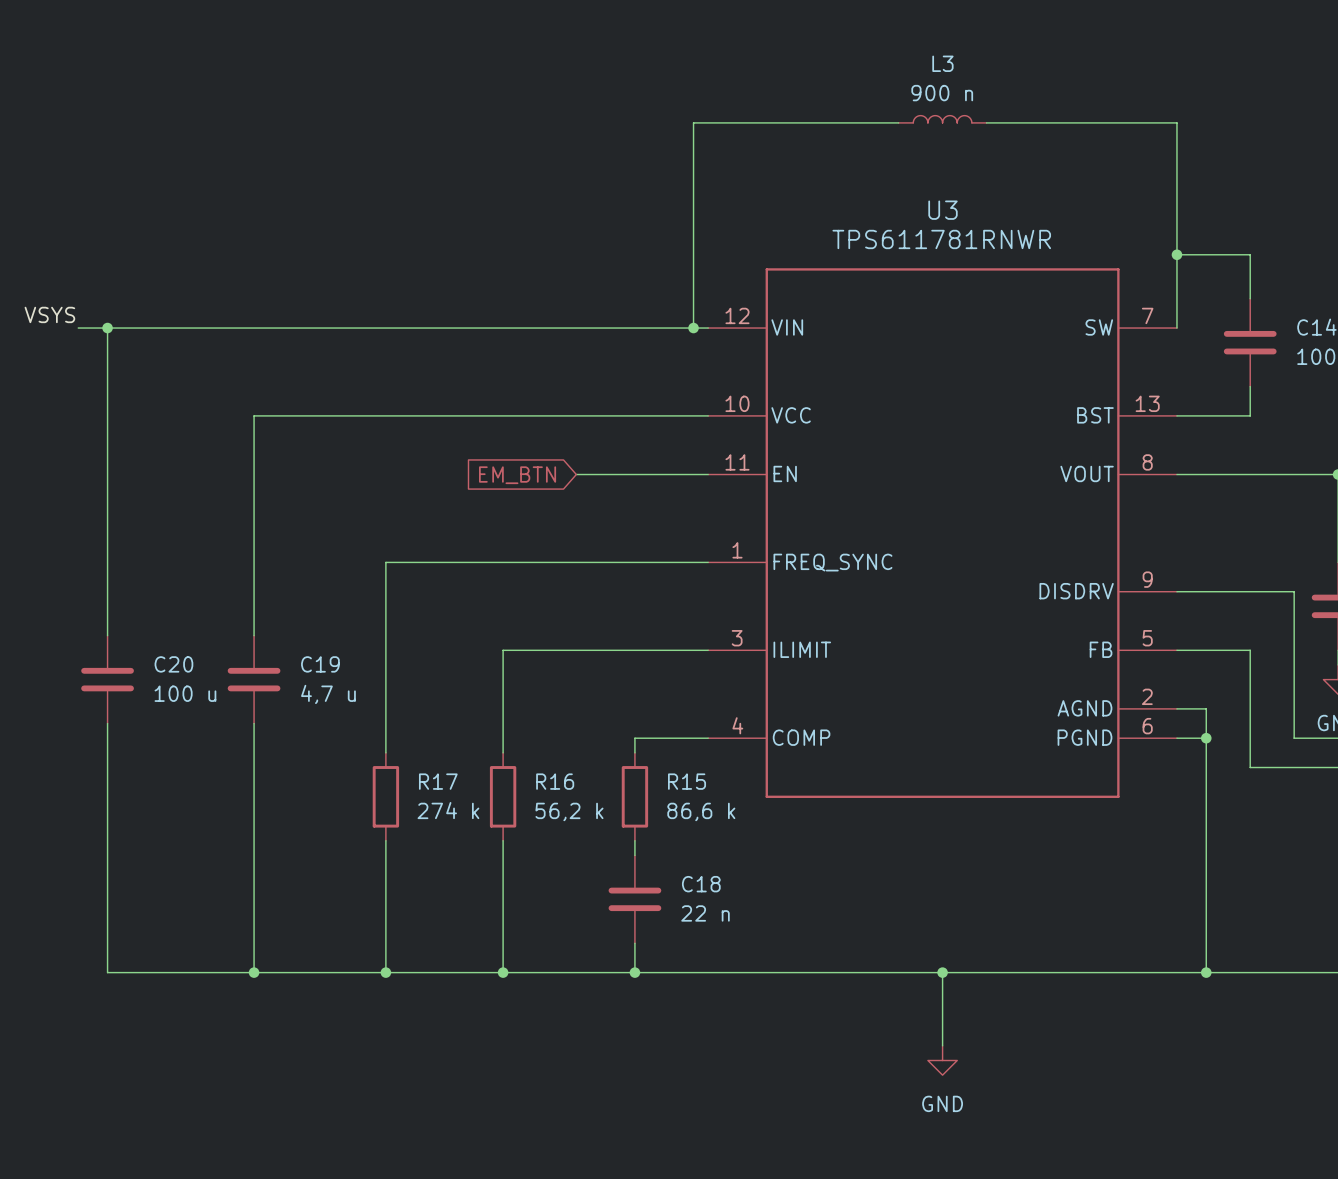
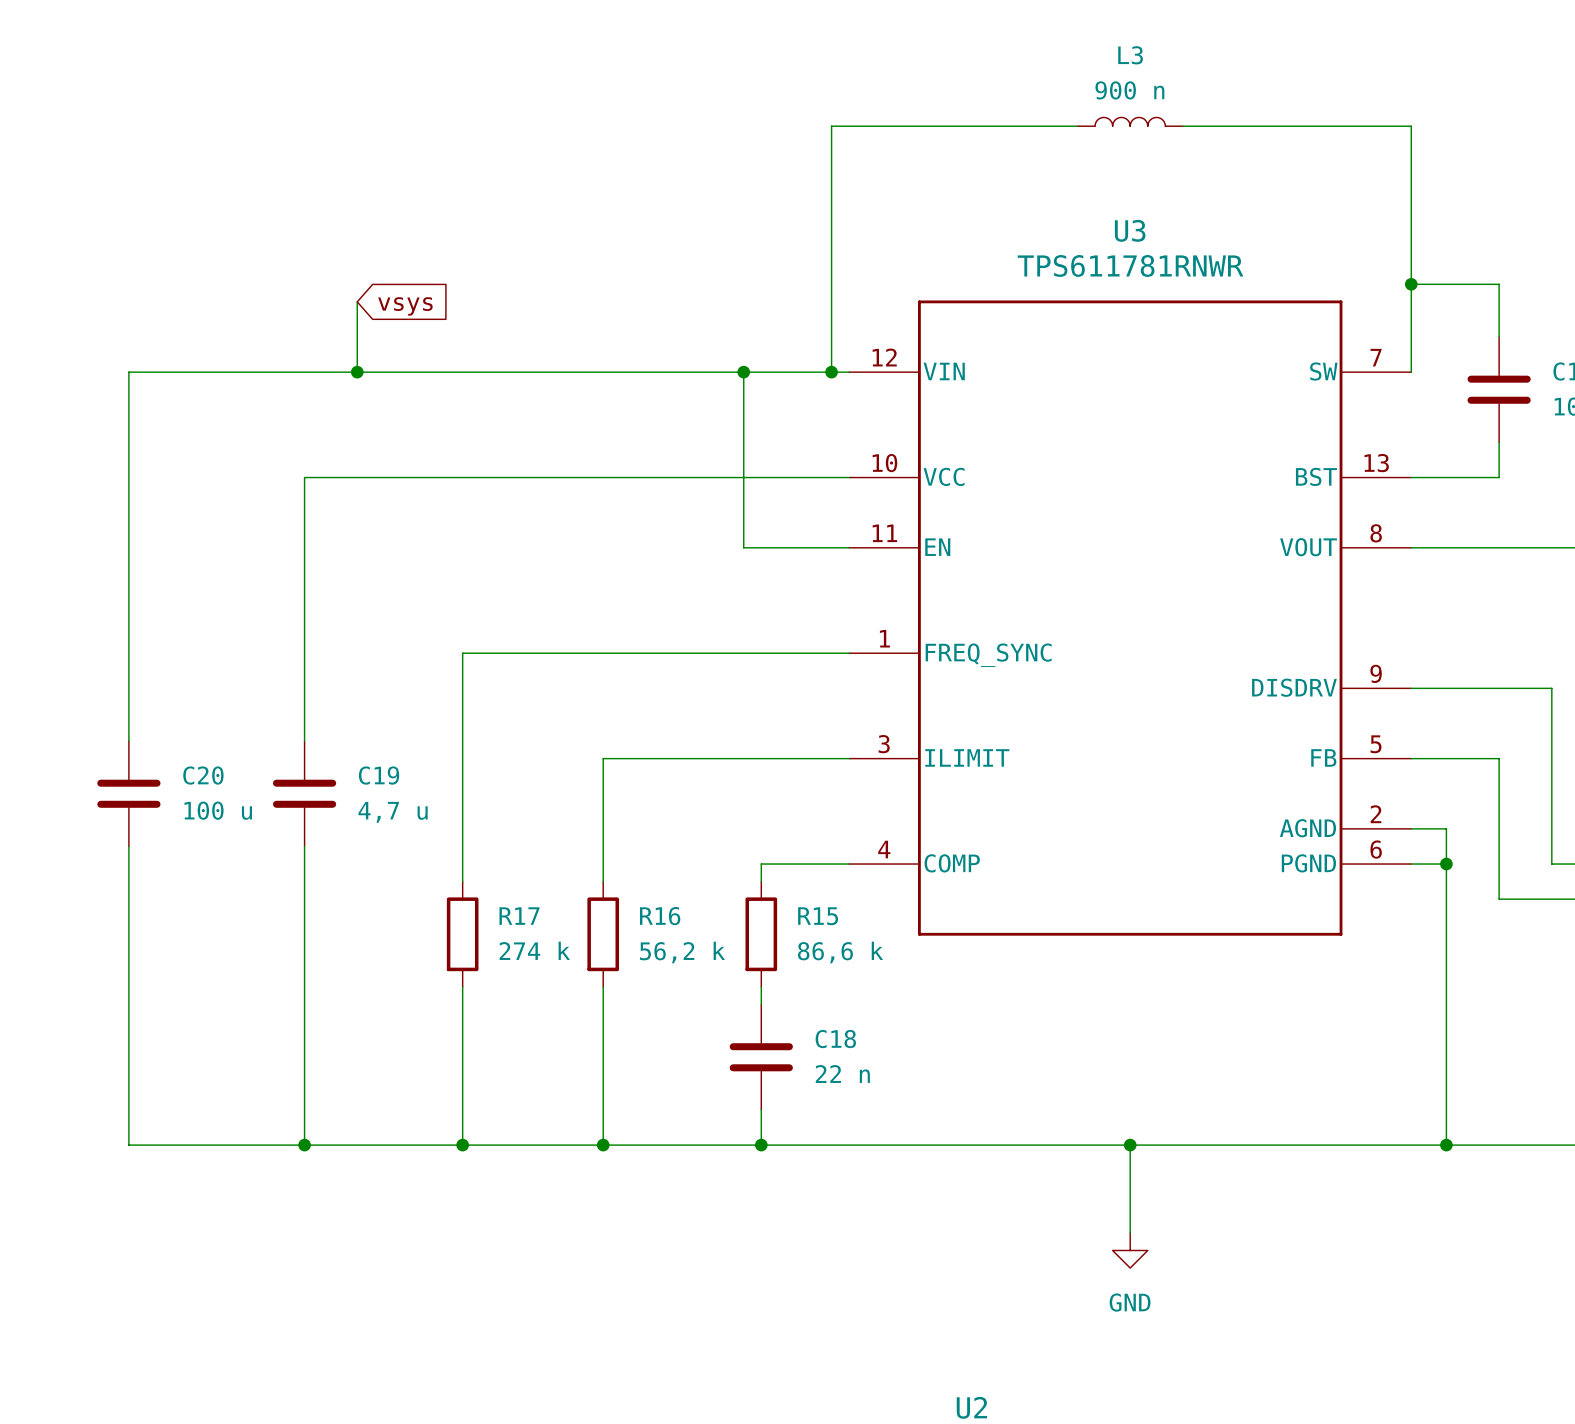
wire: none -> (357, 301) (357, 372)
global label: none -> vsys (405, 306)
label: VSYS (49, 314) -> none
wire: (78, 328) (107, 328) -> none
junction: (107, 328) -> none
junction: none -> (357, 372)
junction: none -> (743, 372)
wire: (576, 474) (620, 474) -> (743, 372) (743, 547)
global label: EM_BTN (517, 475) -> none

